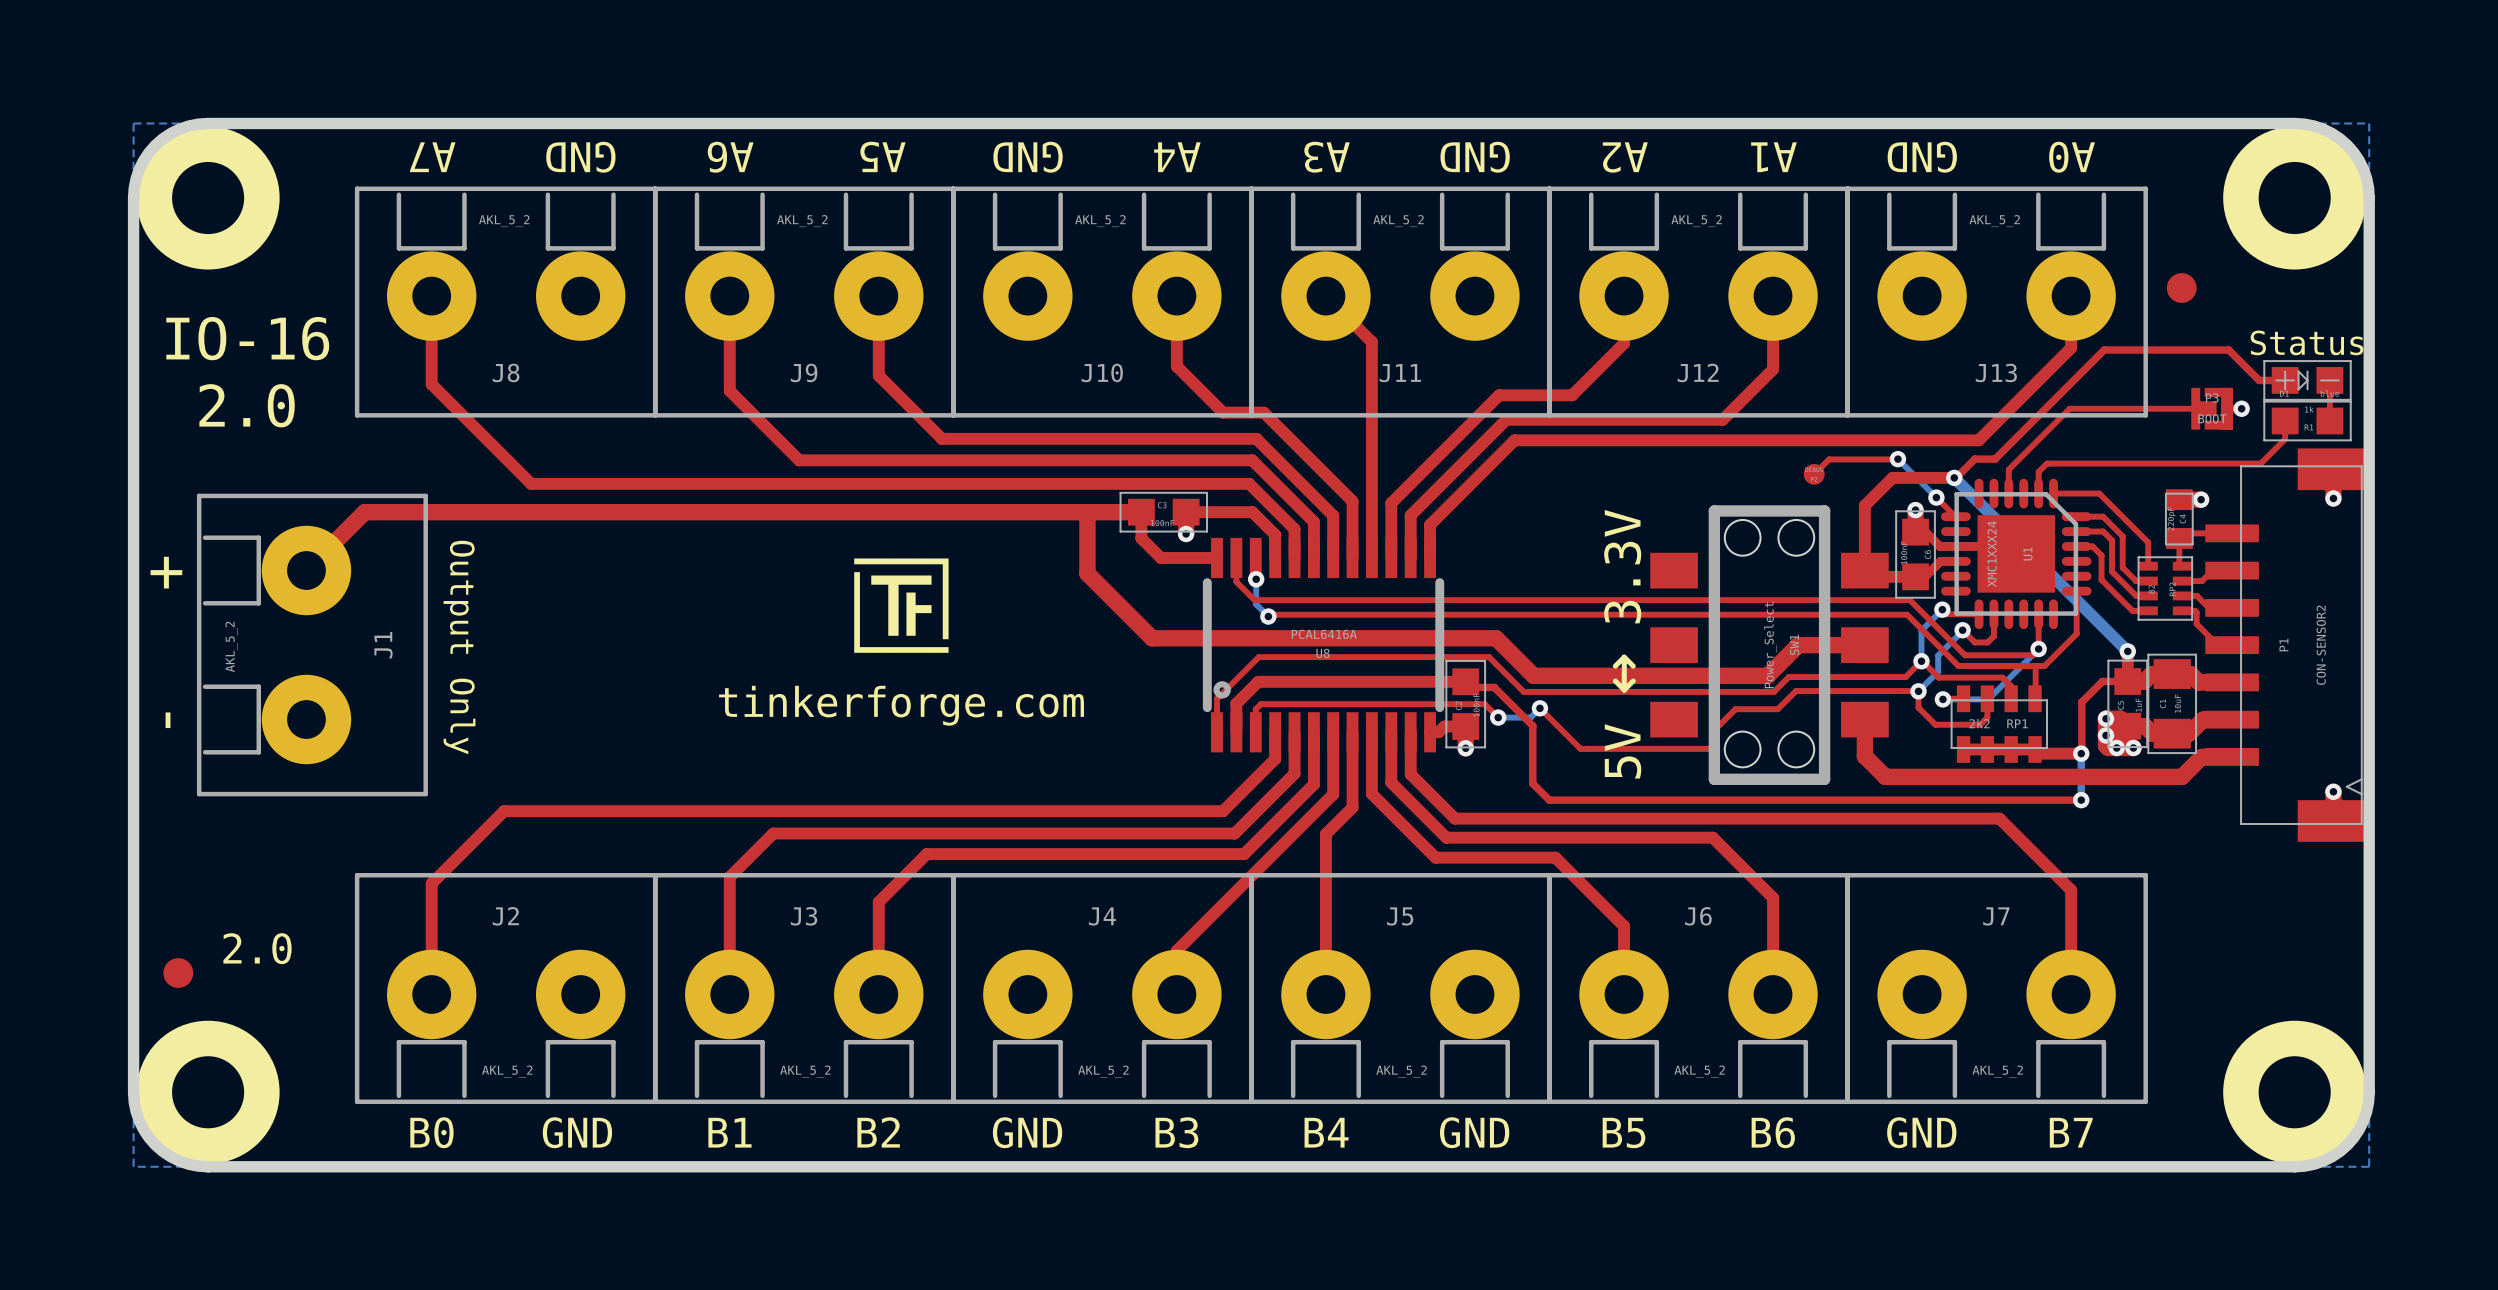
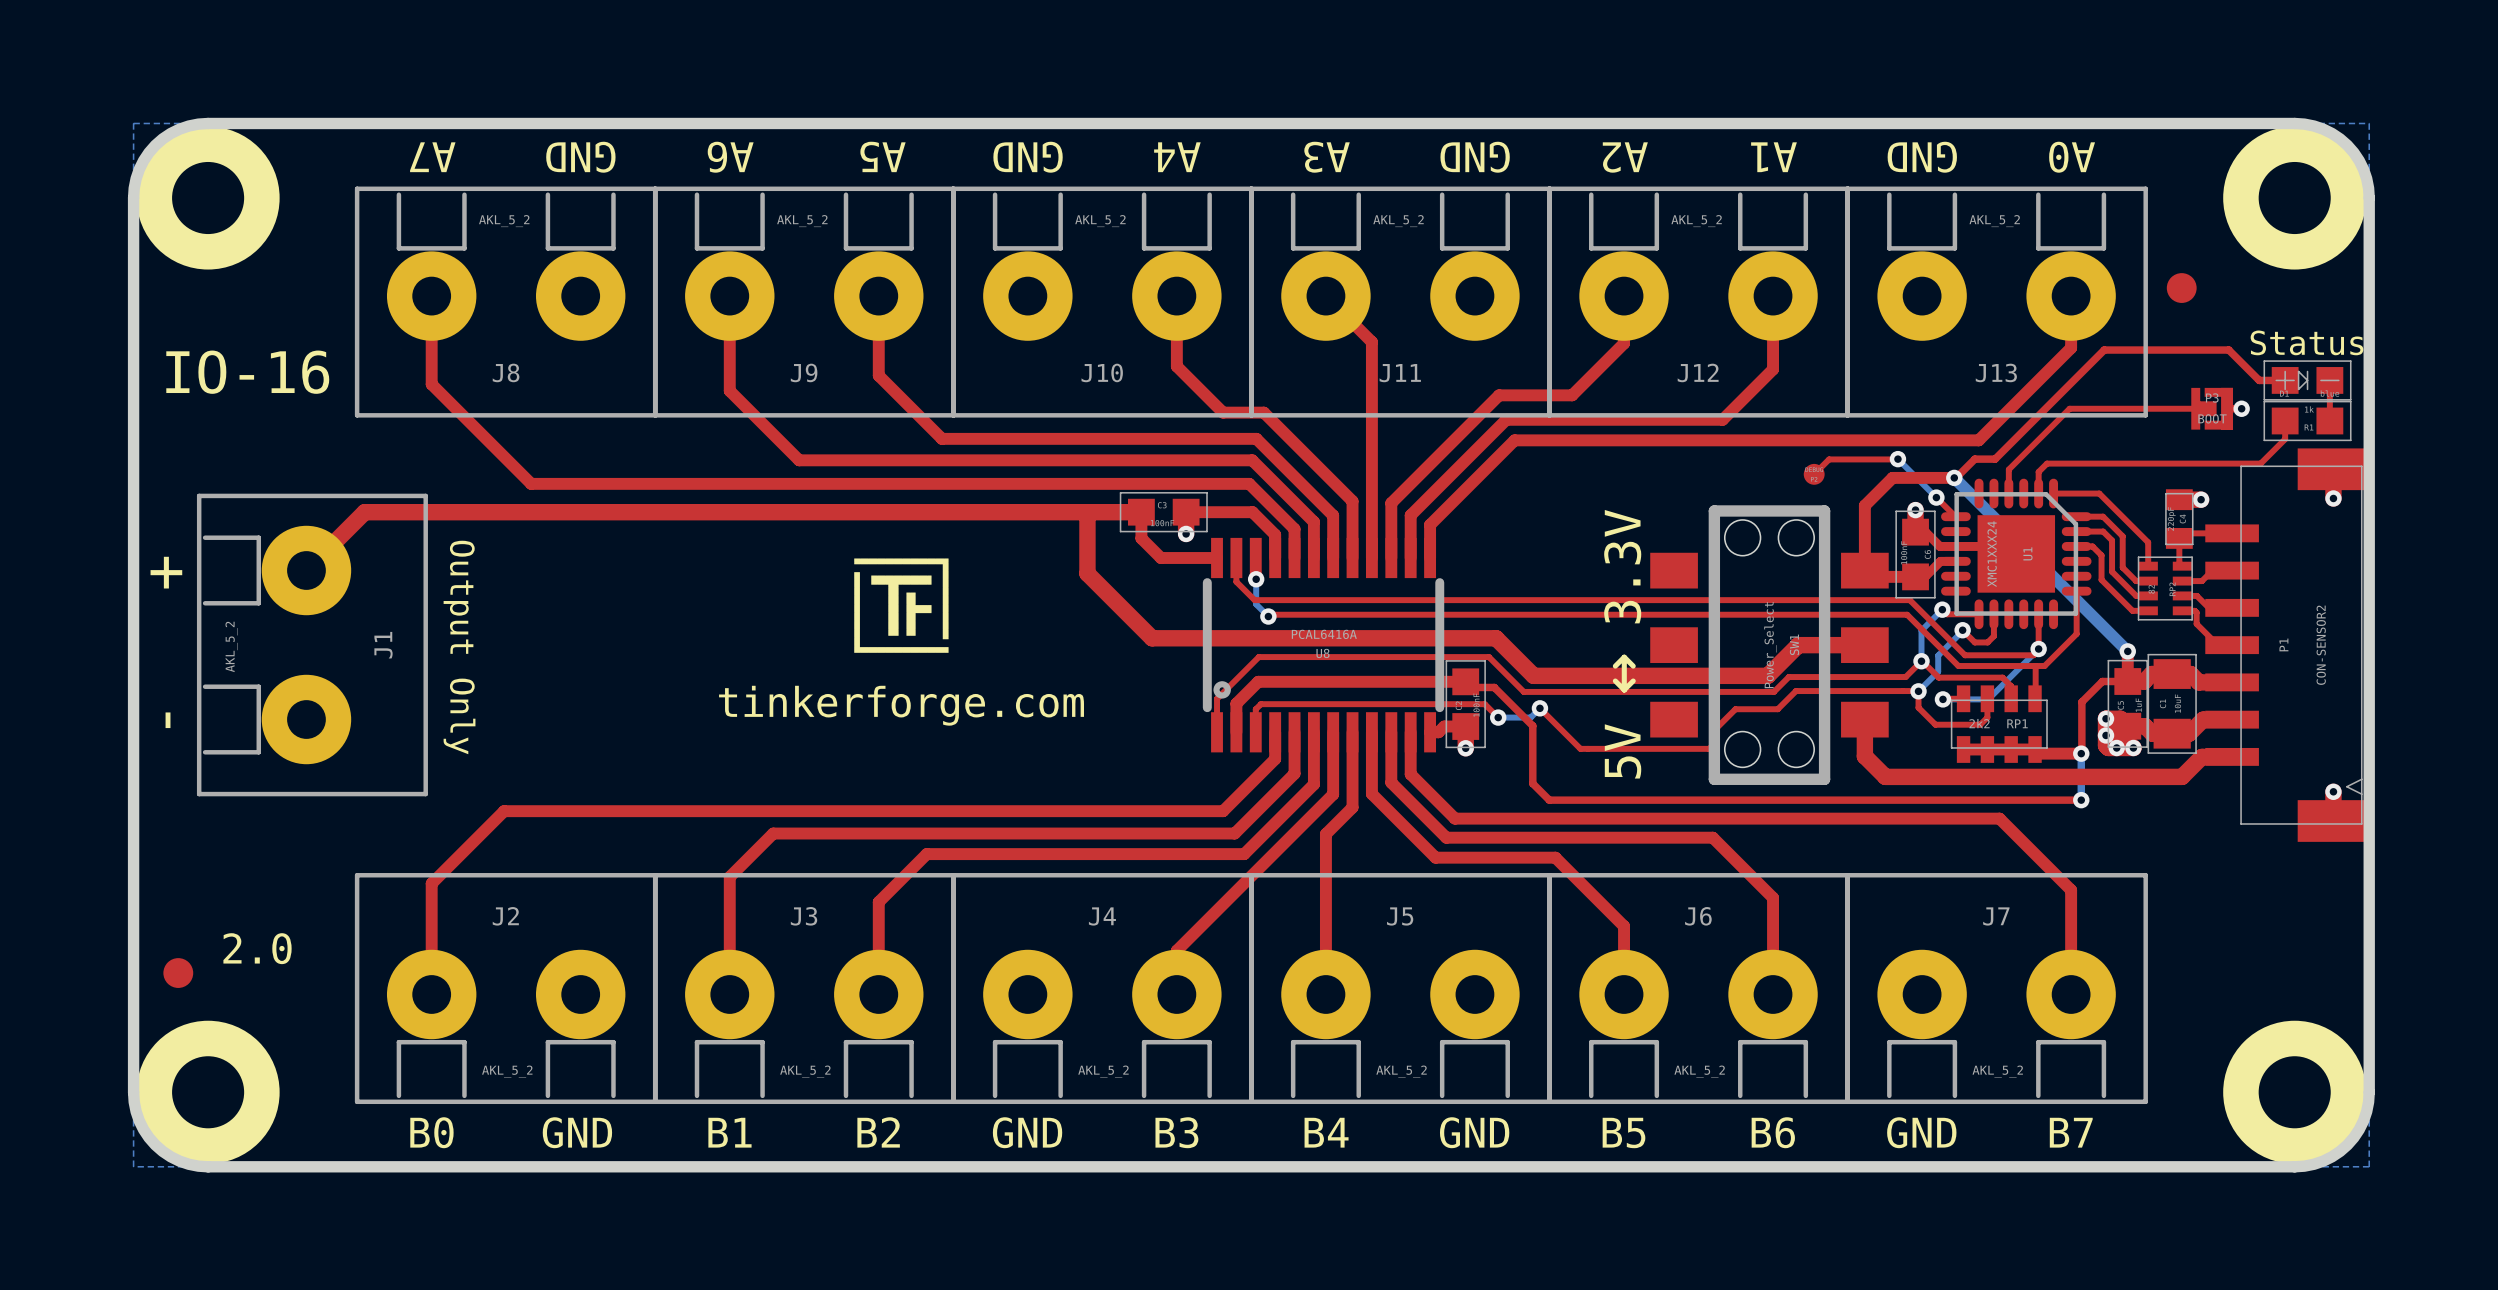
text position: IO-16 (247, 338) -> IO-16 (247, 372)
text: 2.0 (247, 405) -> none

